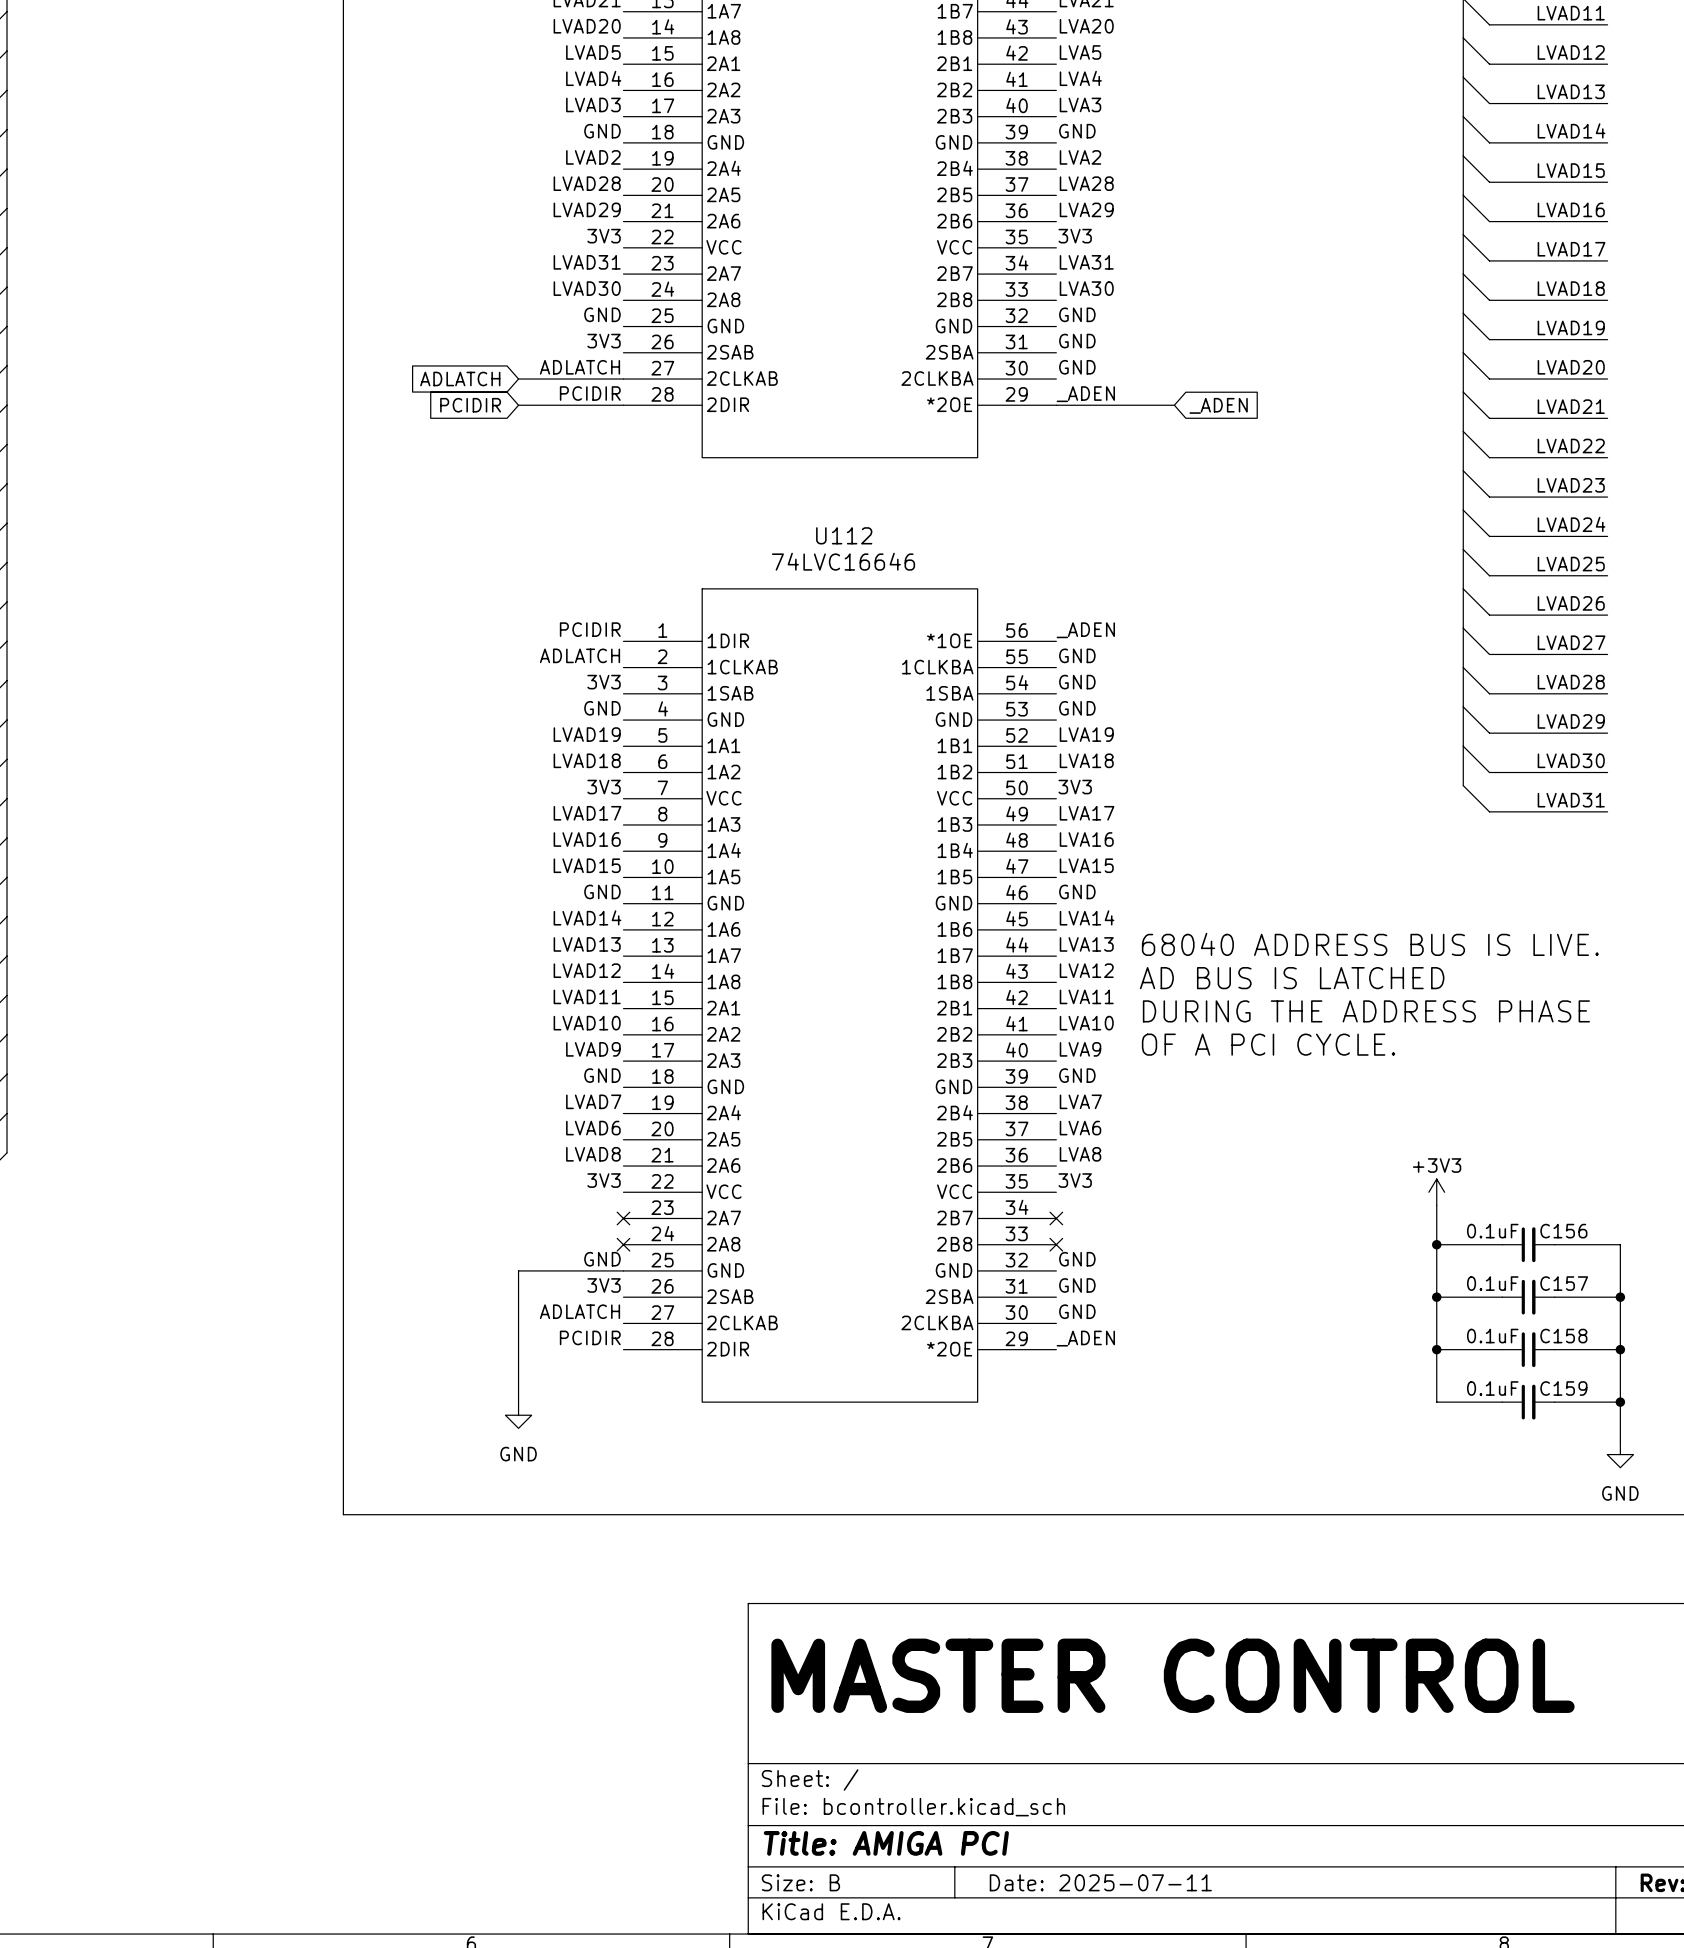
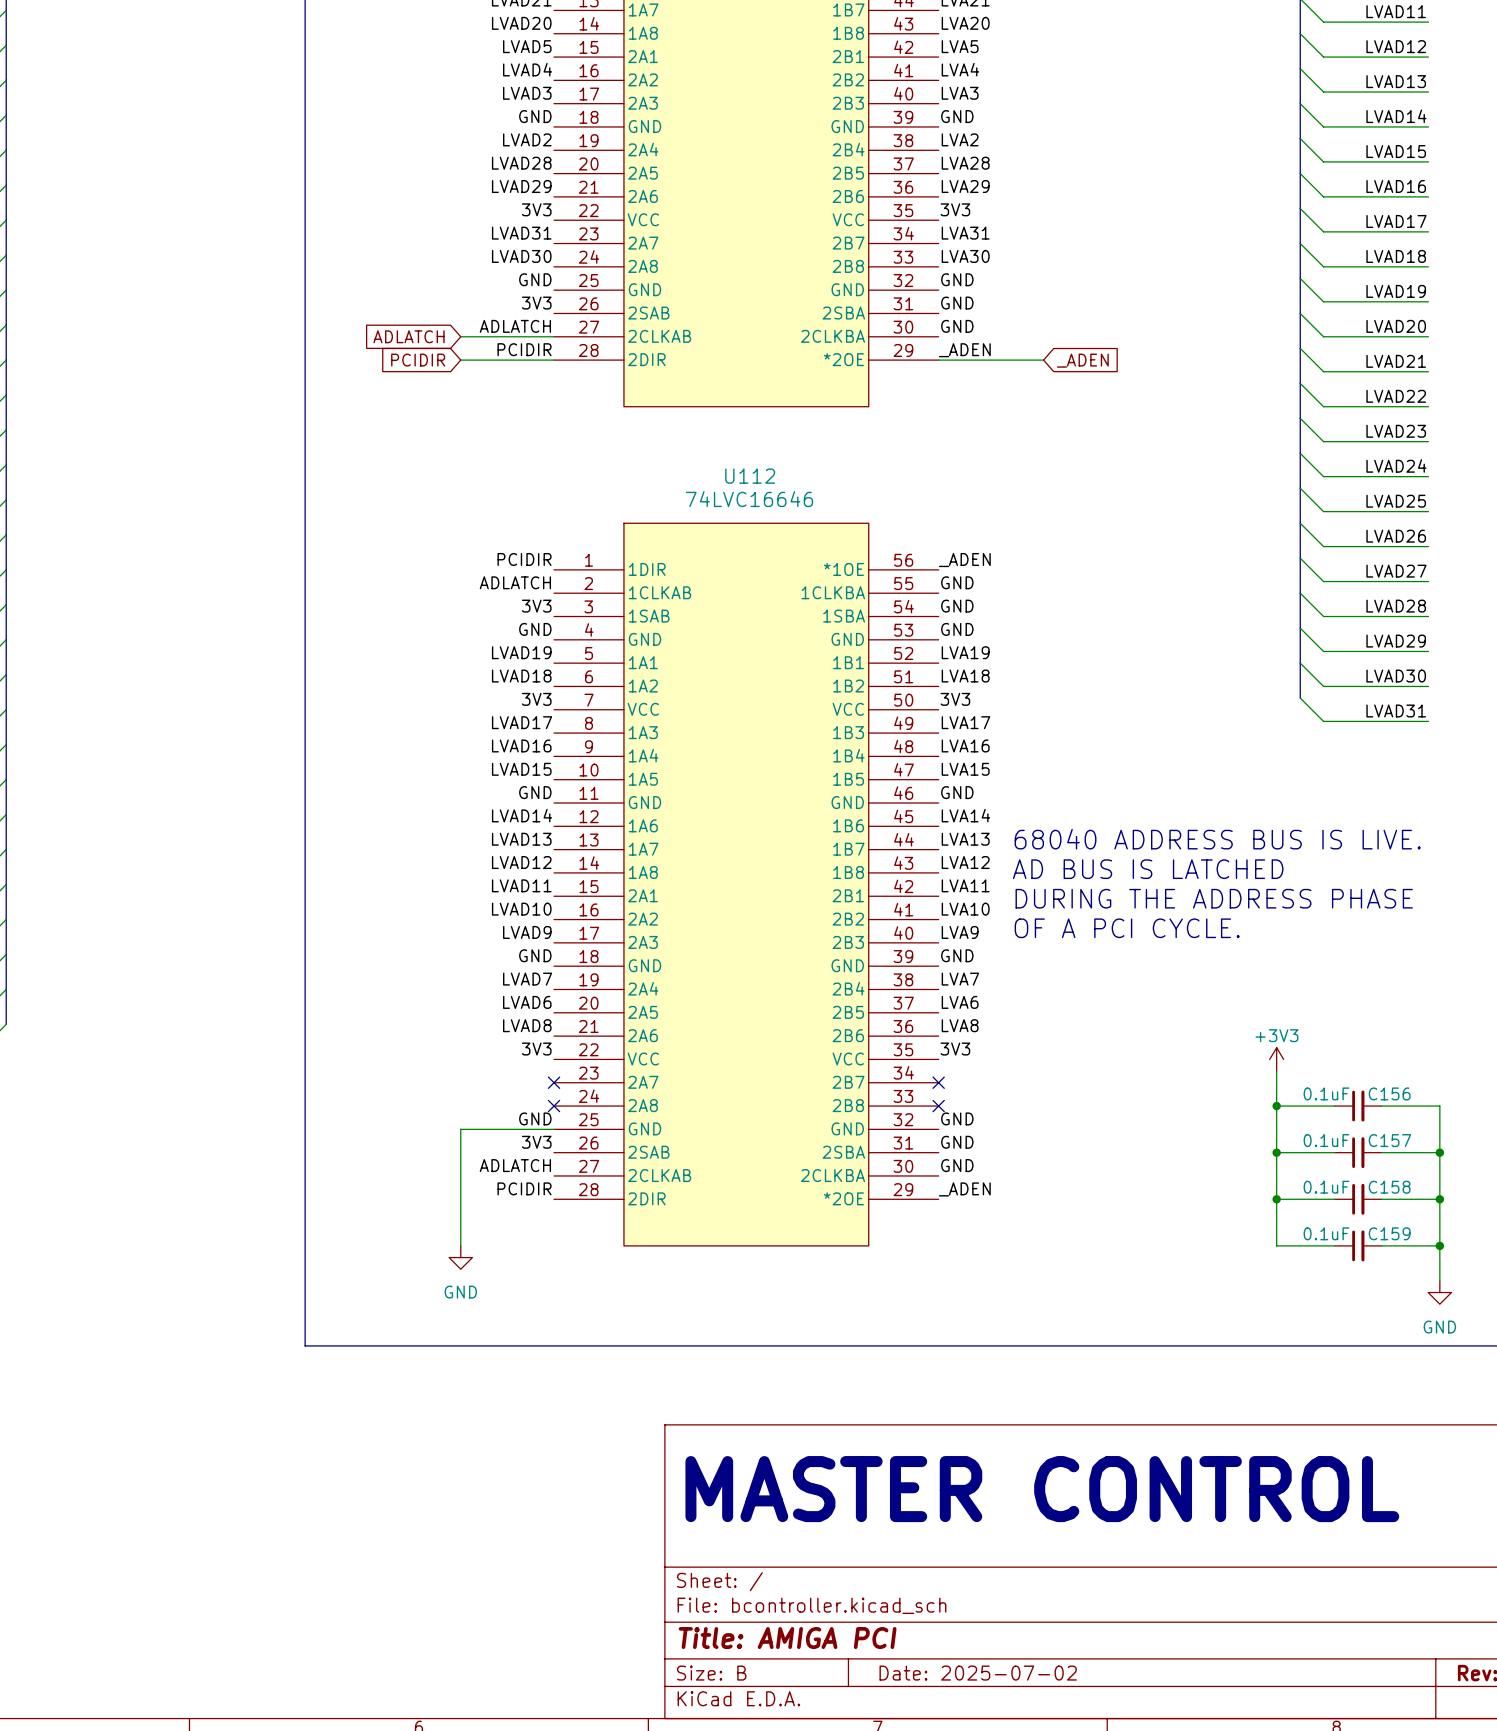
title block: Date: 2025-07-11 (1100, 1882) -> Date: 2025-07-02 (978, 1673)

